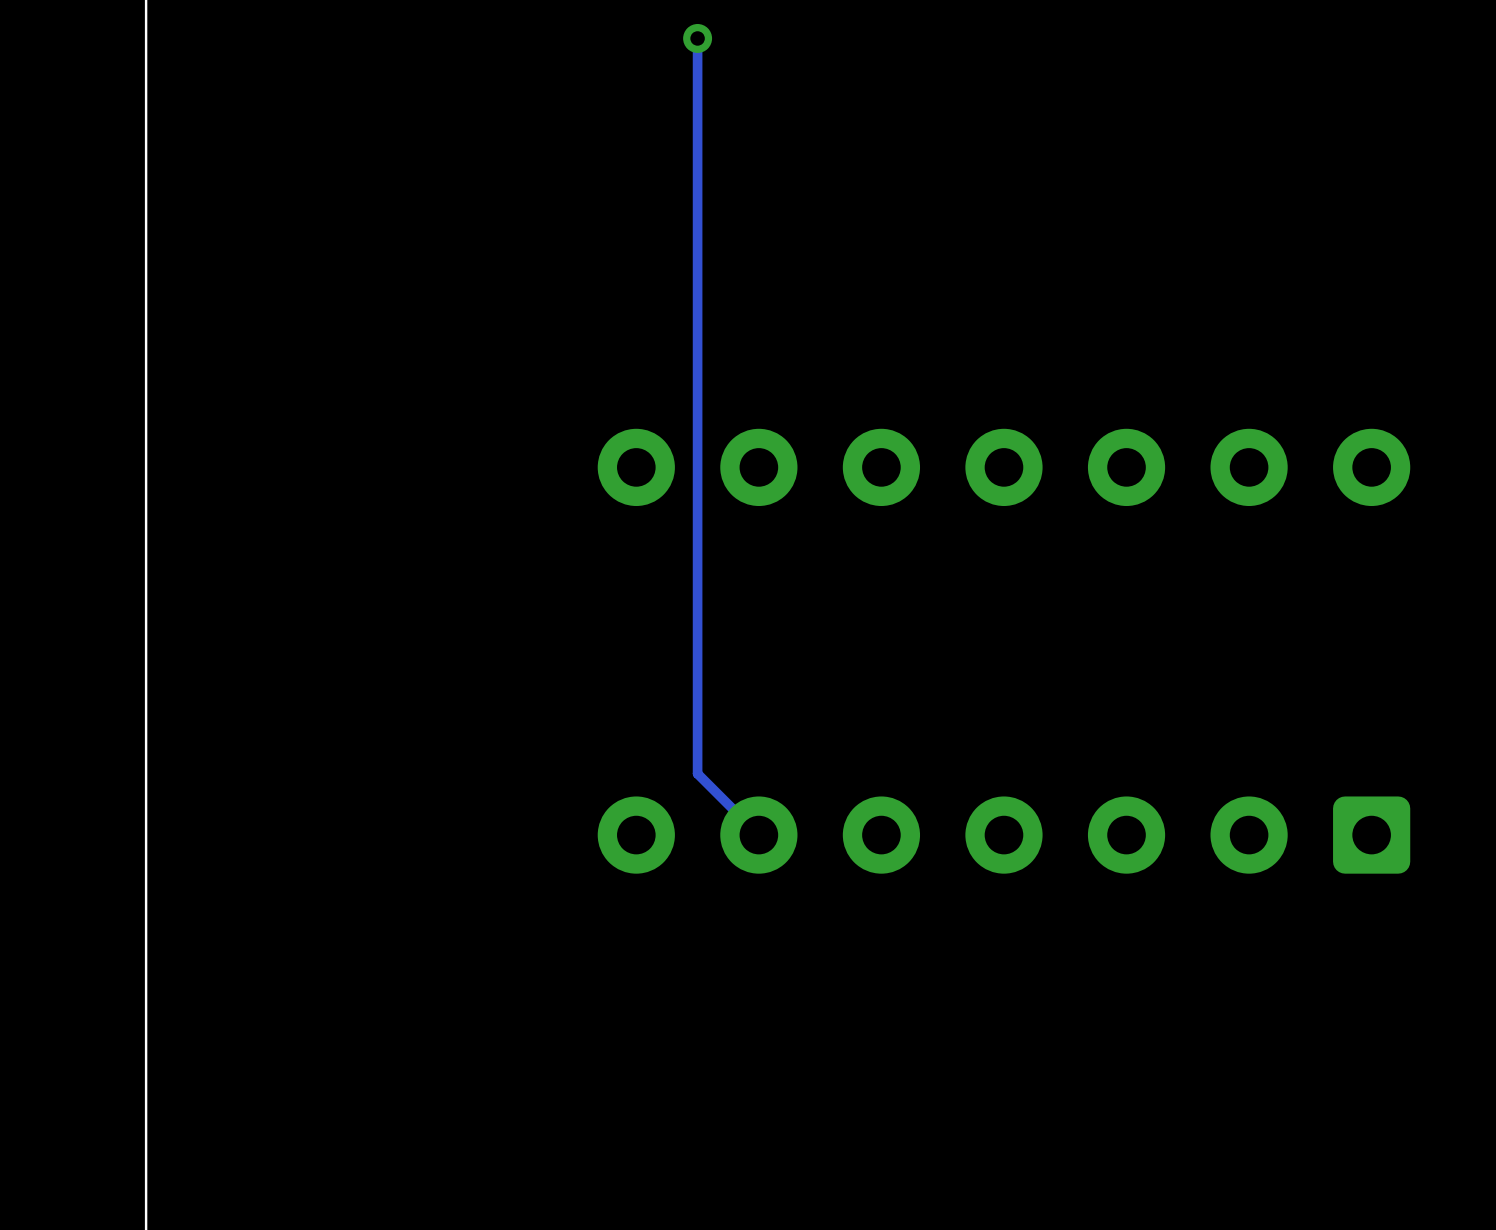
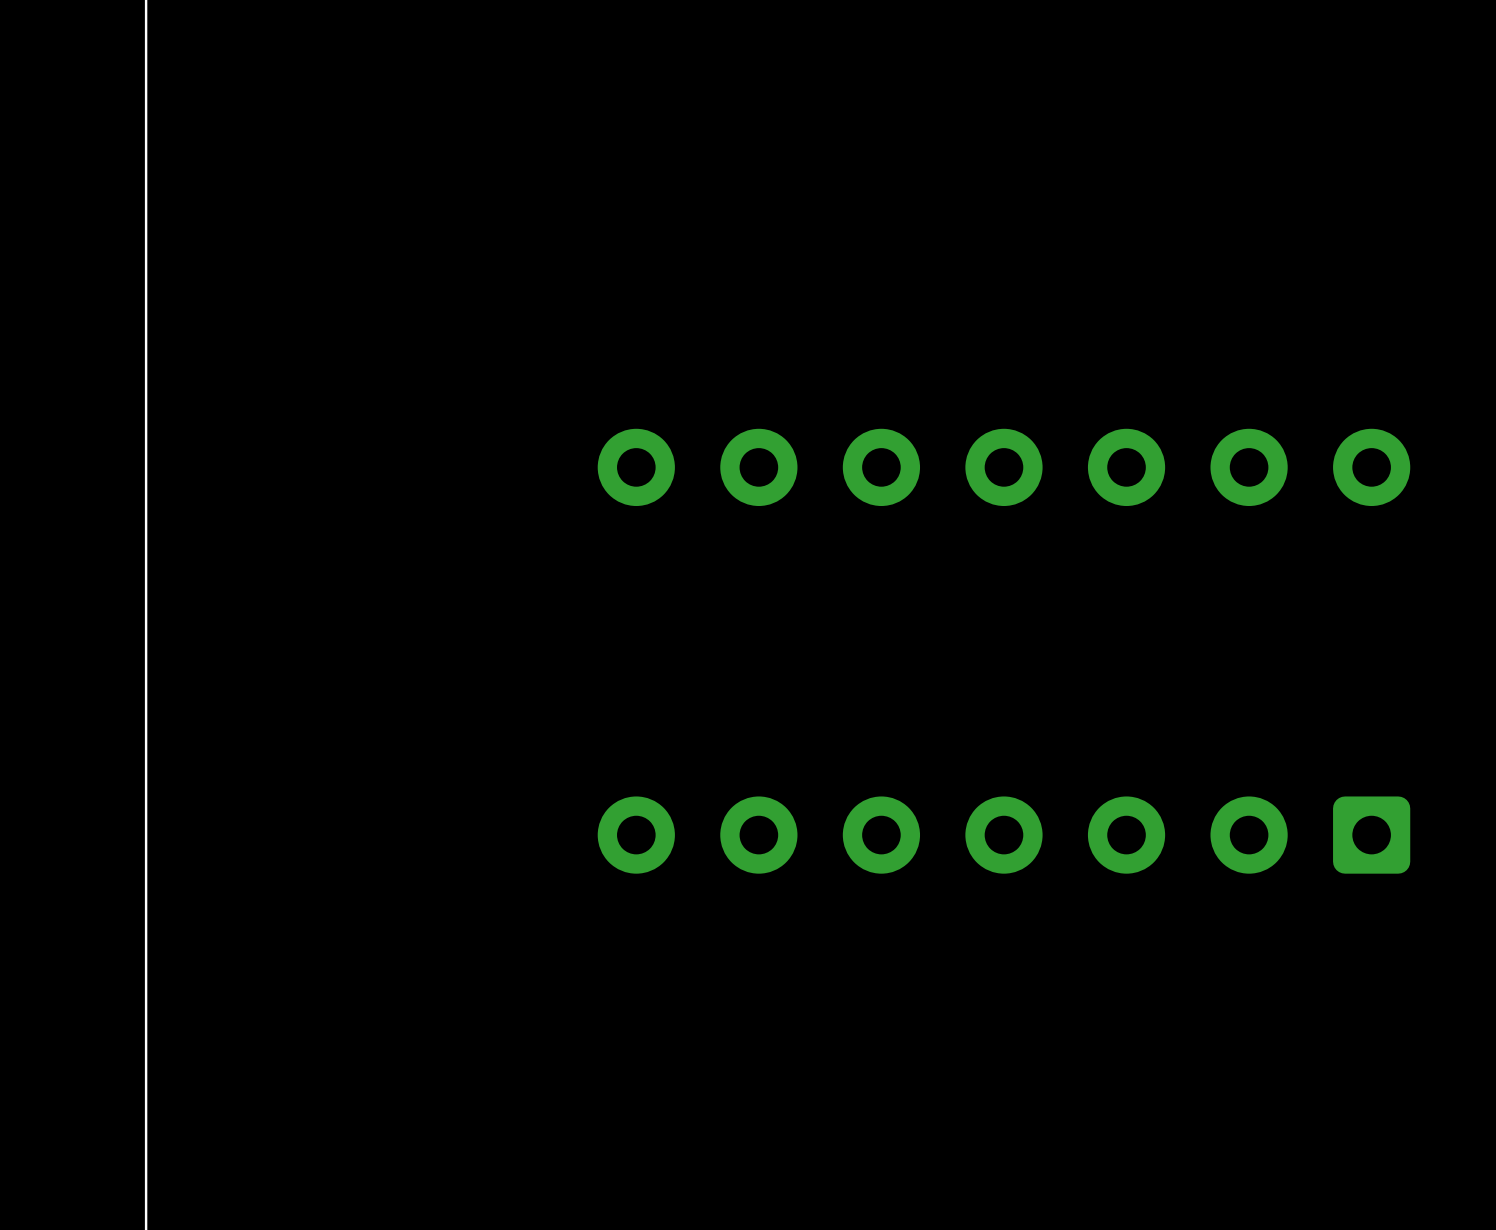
track: (697, 38) (697, 773) (758, 835) -> none
via: (697, 38) -> none

